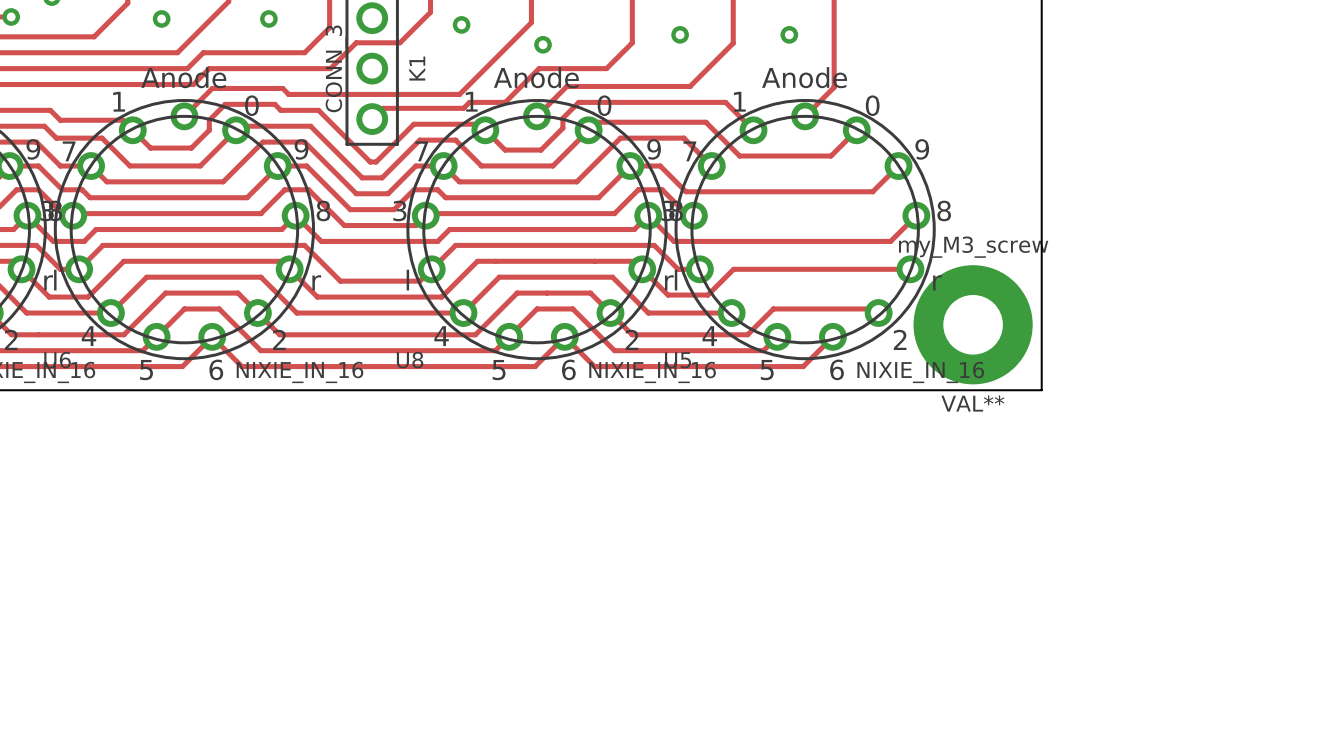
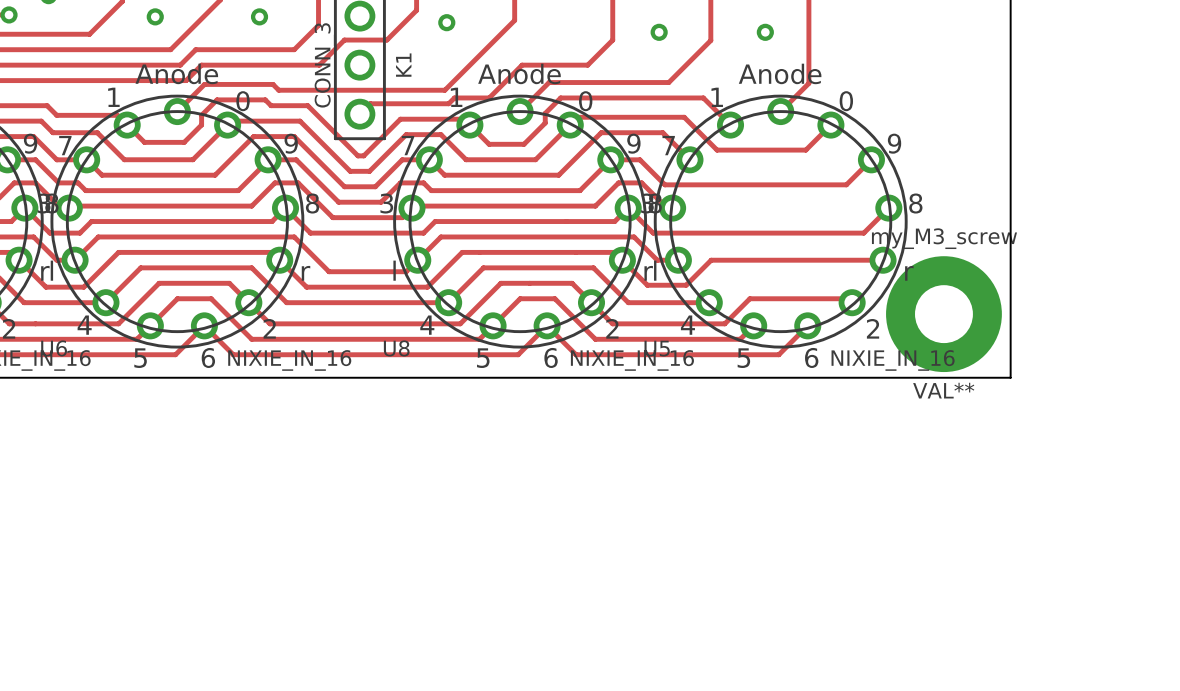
via: (543, 44) -> none

